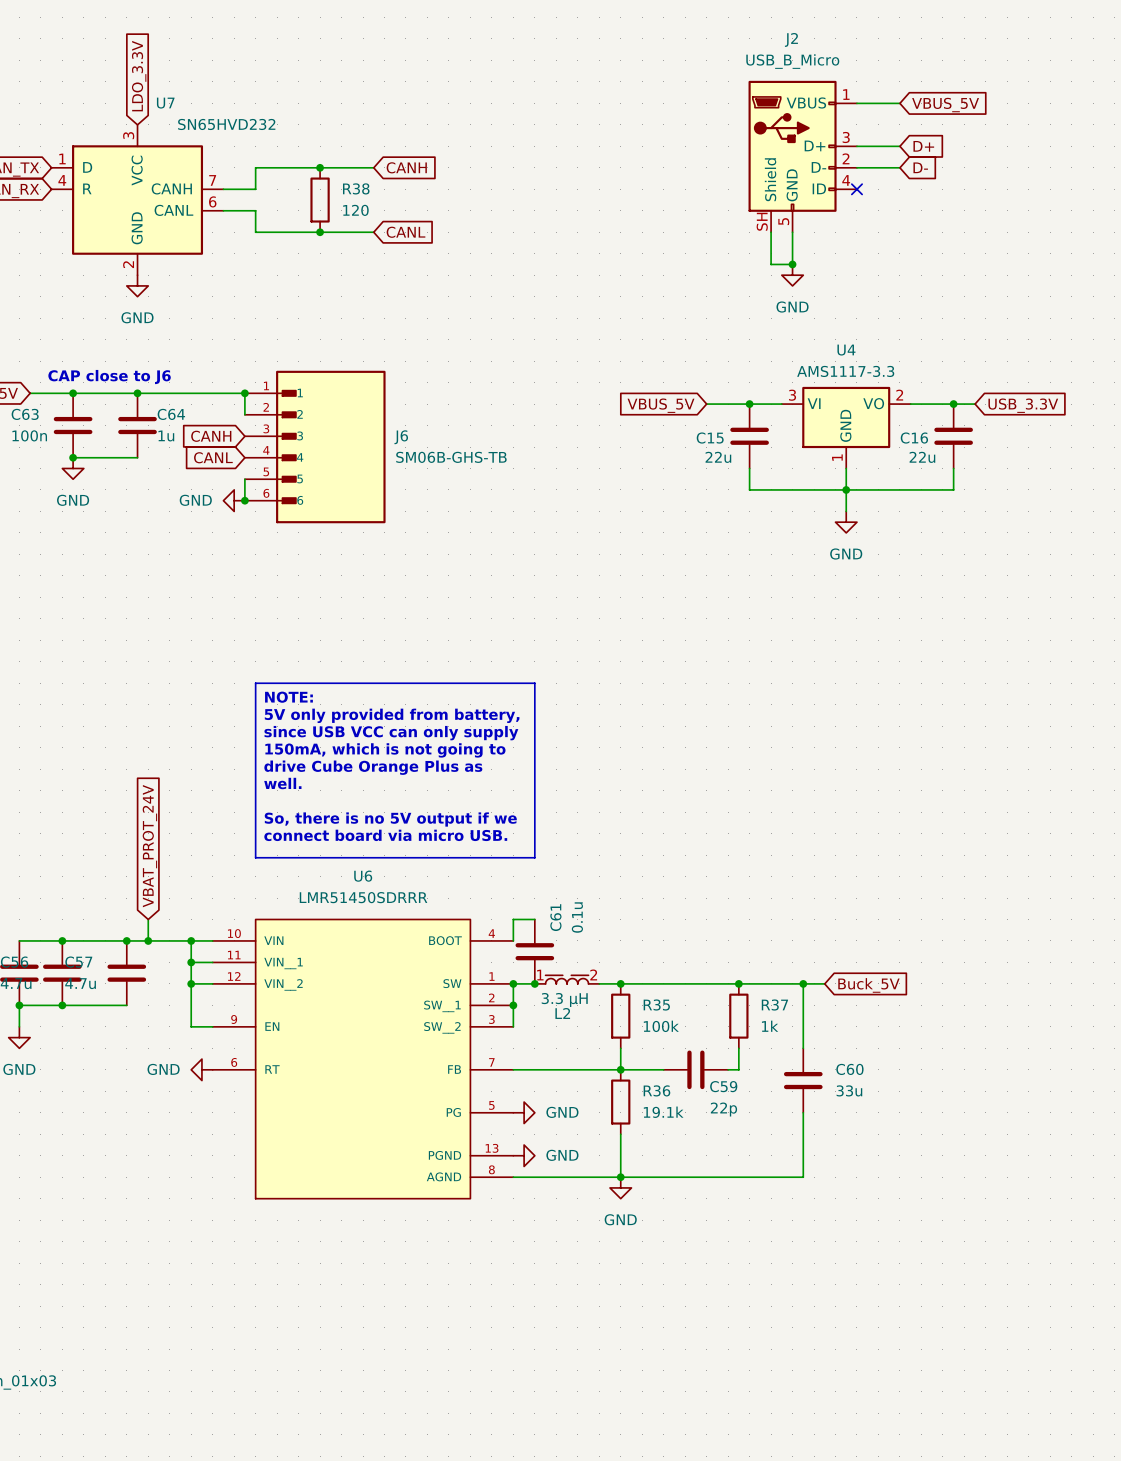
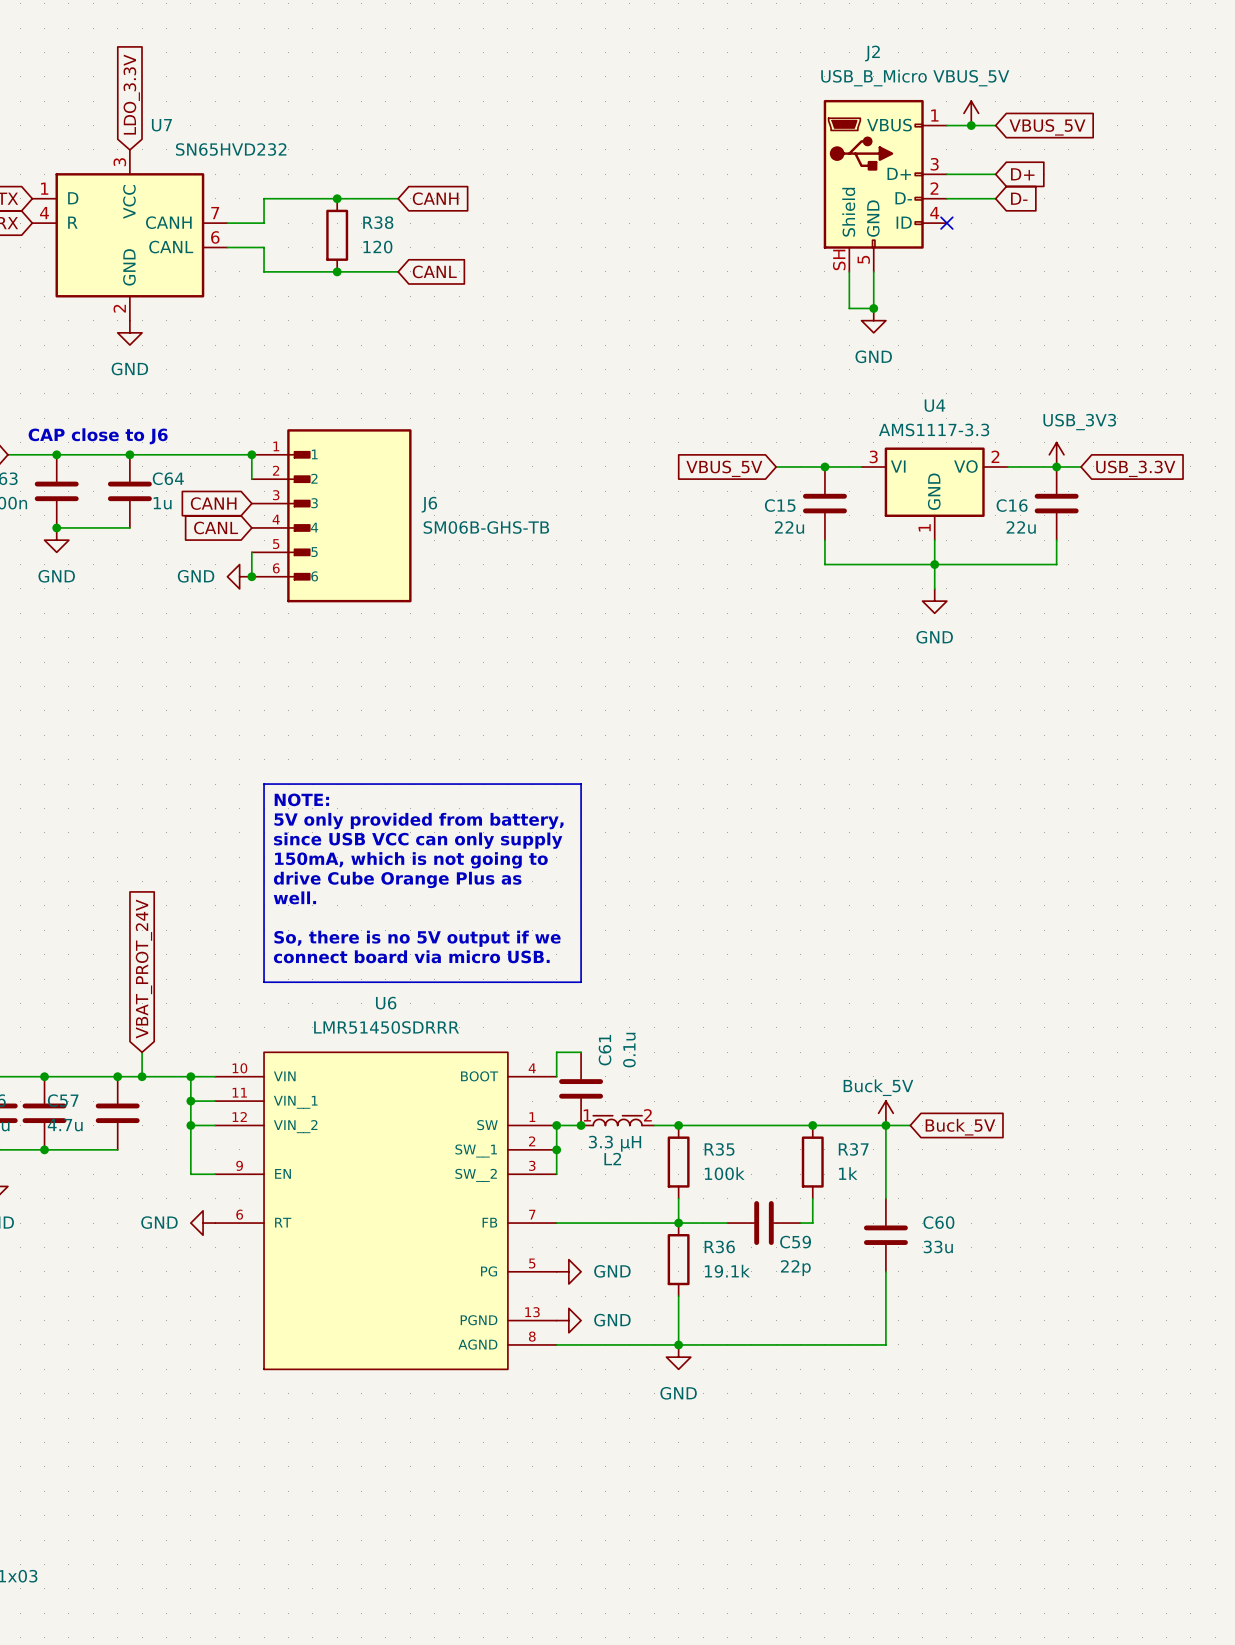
power symbol: none -> VBUS_5V (971, 113)
junction: none -> (971, 125)
power symbol: none -> USB_3V3 (1056, 454)
power symbol: none -> Buck_5V (885, 1113)

